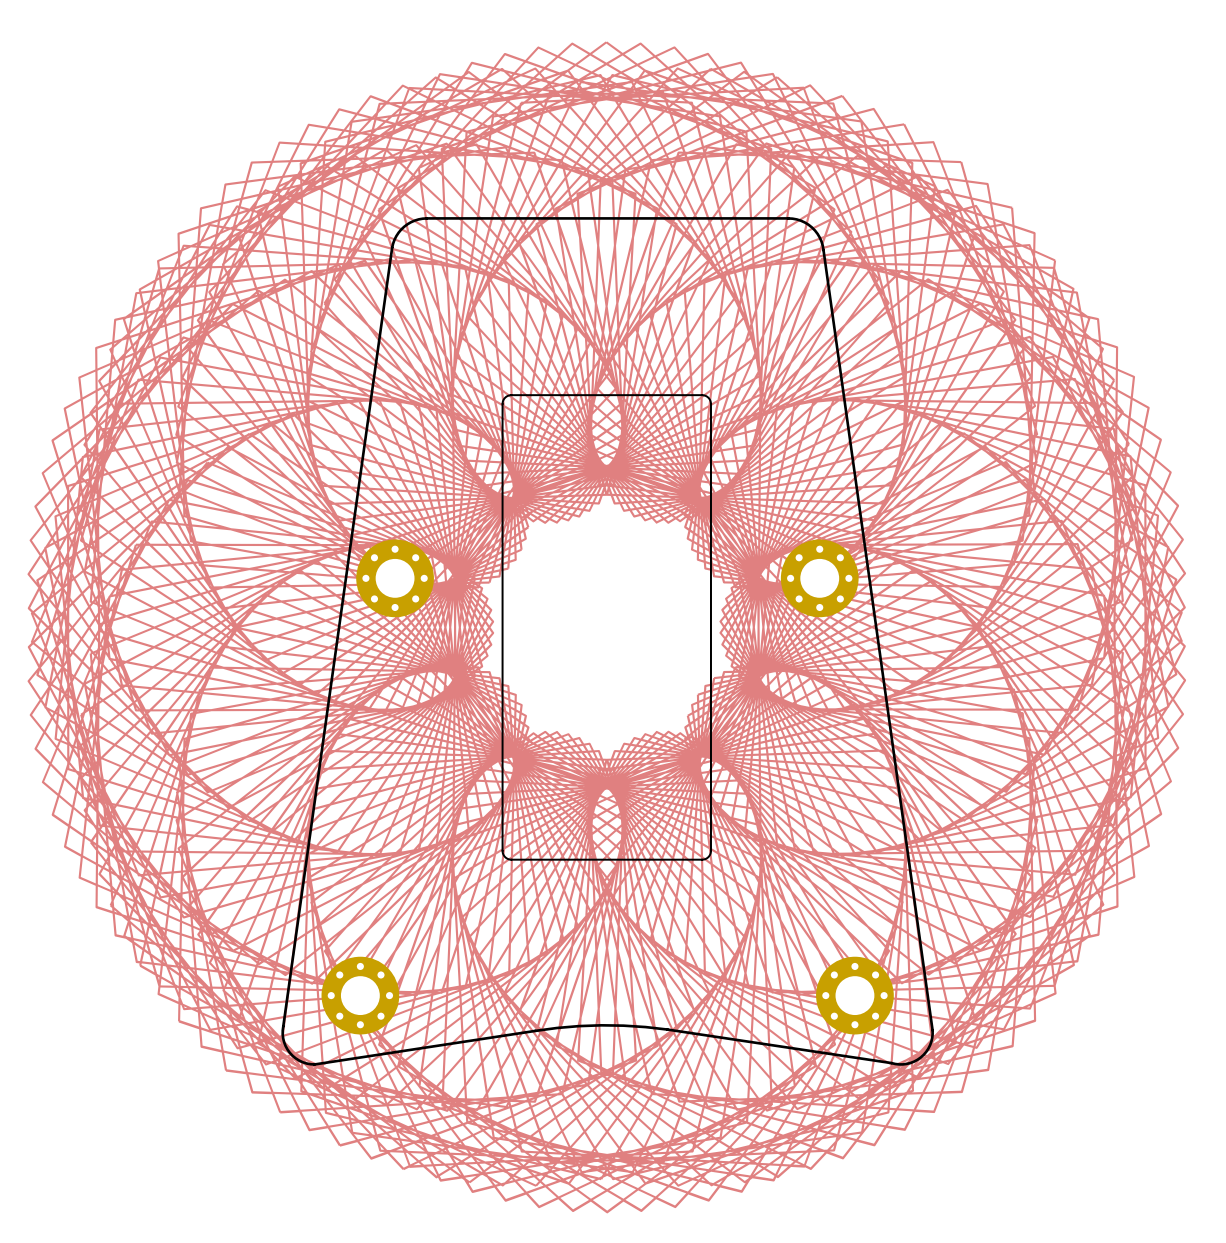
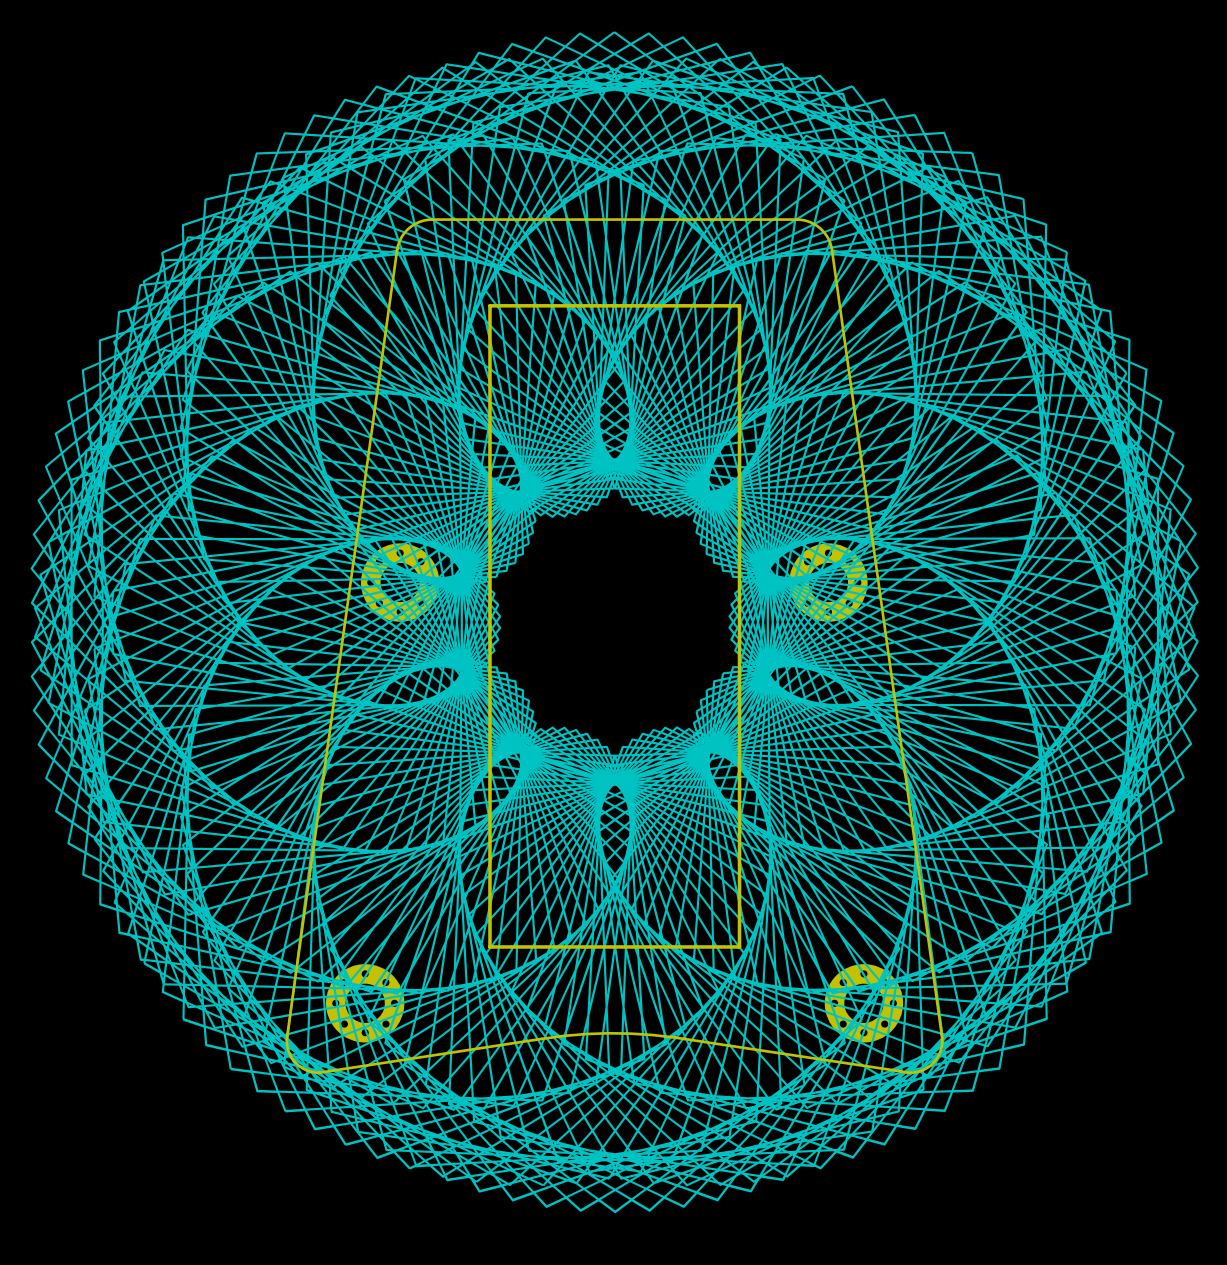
drawing shape: [27, 41, 1187, 1214] -> [30, 31, 1199, 1214]
board edge: (511, 395) (702, 395) (710, 400) (710, 850) (705, 858) (511, 859) (503, 854) (502, 403) (505, 397) (511, 395) -> (489, 305) (489, 946) (739, 946) (739, 305) (489, 305)

